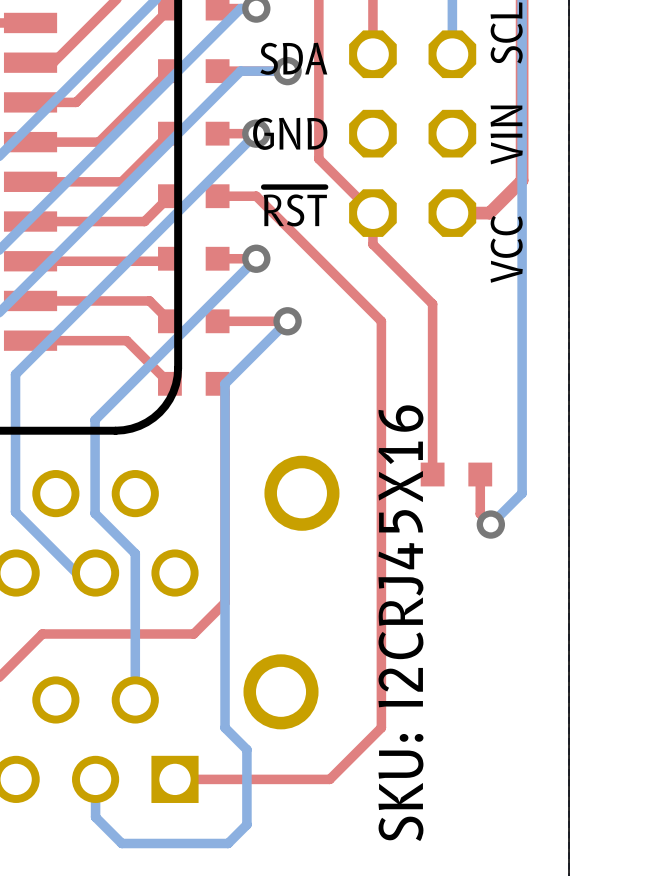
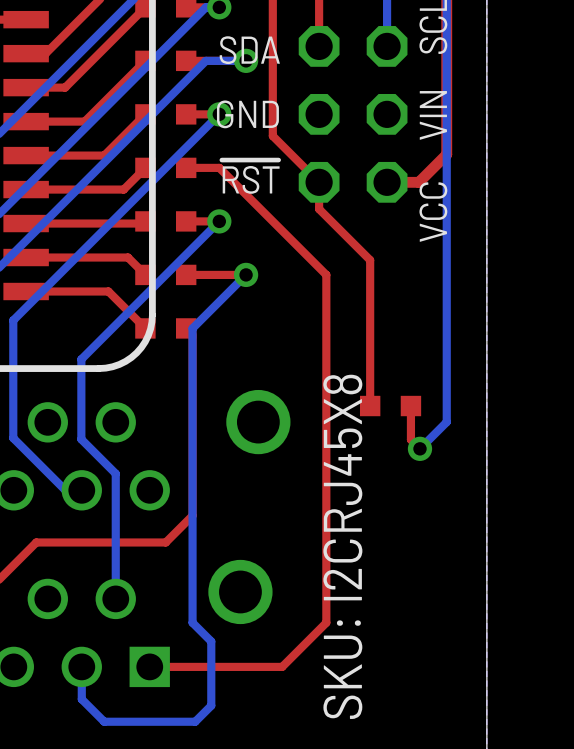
text: SKU: I2CRJ45X16 (400, 623) -> SKU: I2CRJ45X8 (342, 546)

